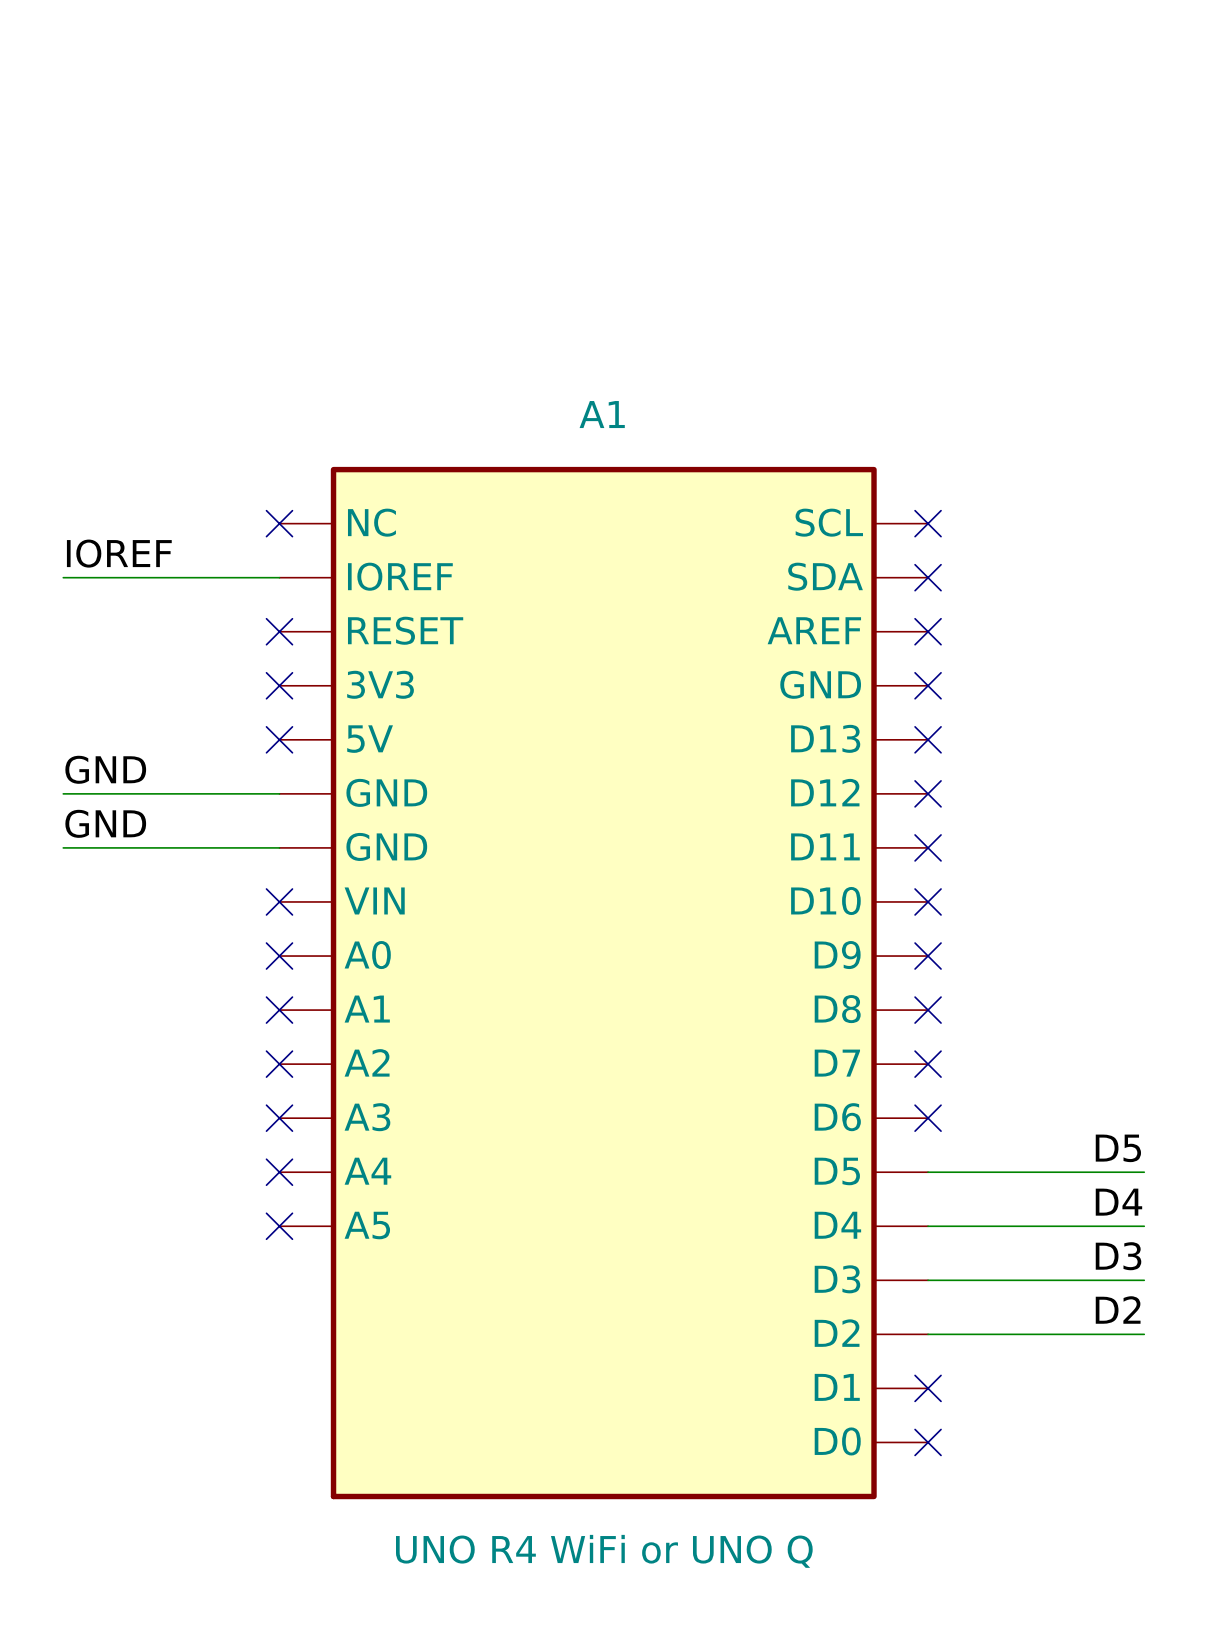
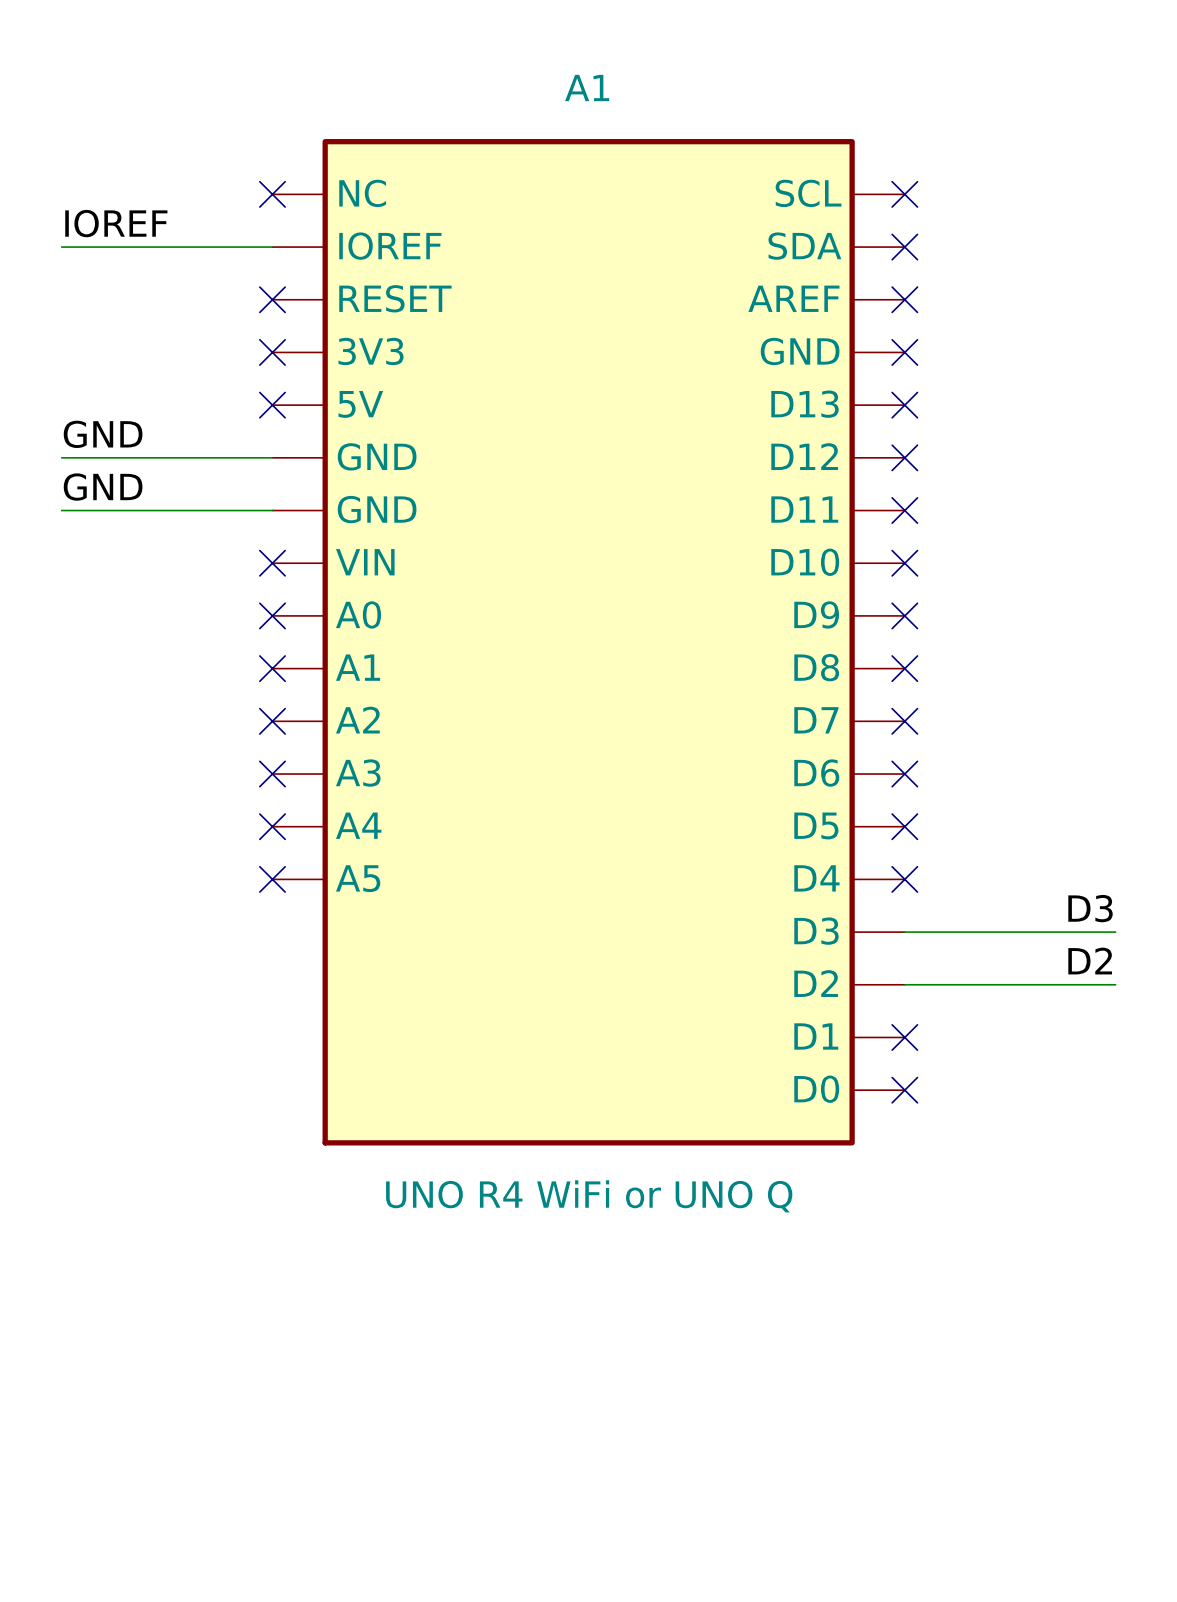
no-connect mark: none -> (272, 194)
no-connect mark: none -> (904, 194)
no-connect mark: none -> (904, 247)
no-connect mark: none -> (272, 299)
no-connect mark: none -> (904, 299)
no-connect mark: none -> (272, 352)
no-connect mark: none -> (904, 352)
no-connect mark: none -> (272, 405)
no-connect mark: none -> (904, 405)
label: none -> GND (103, 434)
no-connect mark: none -> (904, 457)
label: none -> GND (103, 487)
no-connect mark: (279, 523) -> none
label position: IOREF (119, 553) -> IOREF (116, 223)
wire: (63, 577) (279, 577) -> (61, 247) (272, 247)
no-connect mark: none -> (272, 563)
label: GND (105, 769) -> none
wire: (63, 793) (279, 793) -> (61, 457) (272, 457)
no-connect mark: none -> (272, 774)
label: GND (105, 823) -> none
wire: (63, 847) (279, 847) -> (61, 510) (272, 510)
no-connect mark: none -> (272, 826)
no-connect mark: (279, 956) -> none
no-connect mark: (928, 956) -> none
A1 position: (603, 983) -> (588, 642)
no-connect mark: (279, 1010) -> none
no-connect mark: (928, 1010) -> none
no-connect mark: (279, 1064) -> none
no-connect mark: (279, 1118) -> none
label: D5 (1118, 1148) -> none
no-connect mark: (279, 1172) -> none
wire: (928, 1172) (1144, 1172) -> none
label: D4 (1118, 1202) -> none
no-connect mark: (279, 1226) -> none
wire: (928, 1226) (1144, 1226) -> none
label position: D3 (1118, 1256) -> D3 (1090, 908)
wire: (928, 1280) (1144, 1280) -> (904, 932) (1115, 932)
label position: D2 (1118, 1310) -> D2 (1090, 961)
wire: (928, 1334) (1144, 1334) -> (904, 984) (1115, 984)
no-connect mark: (928, 1388) -> none
no-connect mark: (928, 1442) -> none

